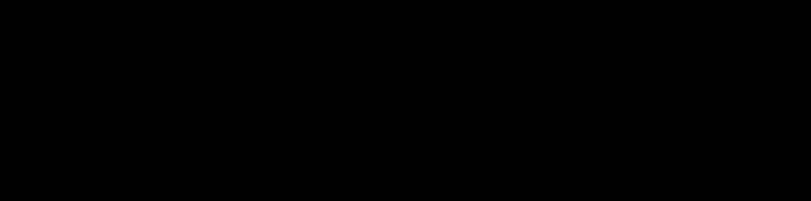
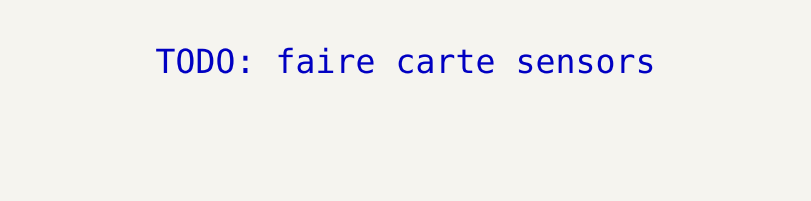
text: none -> TODO: faire carte sensors (404, 60)

